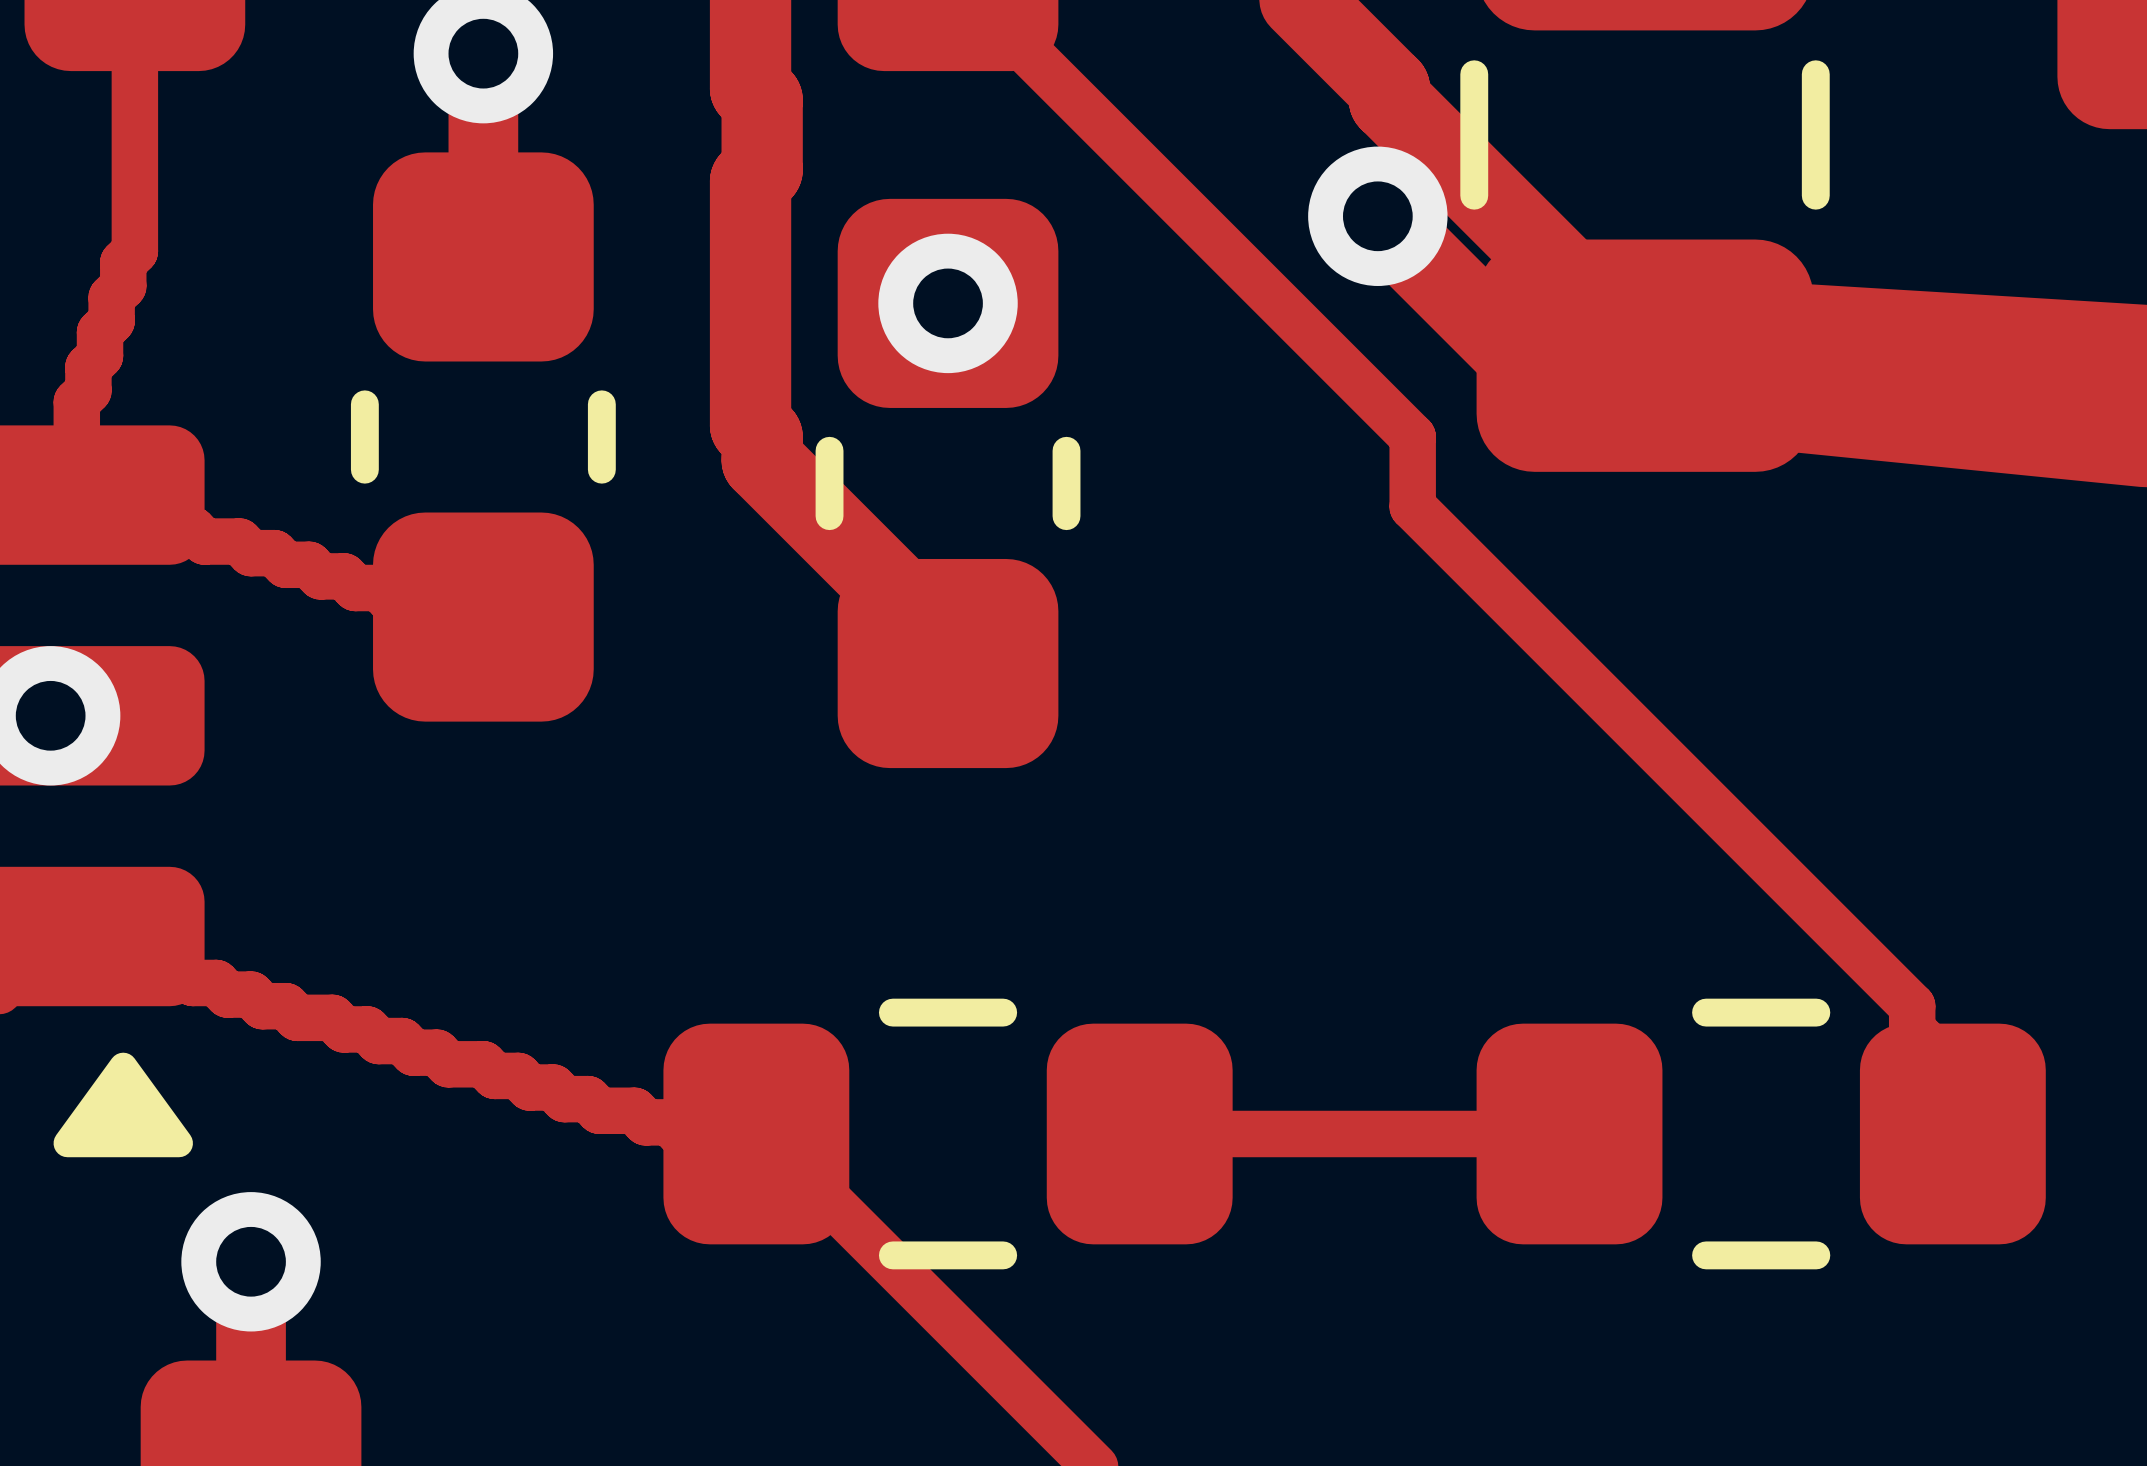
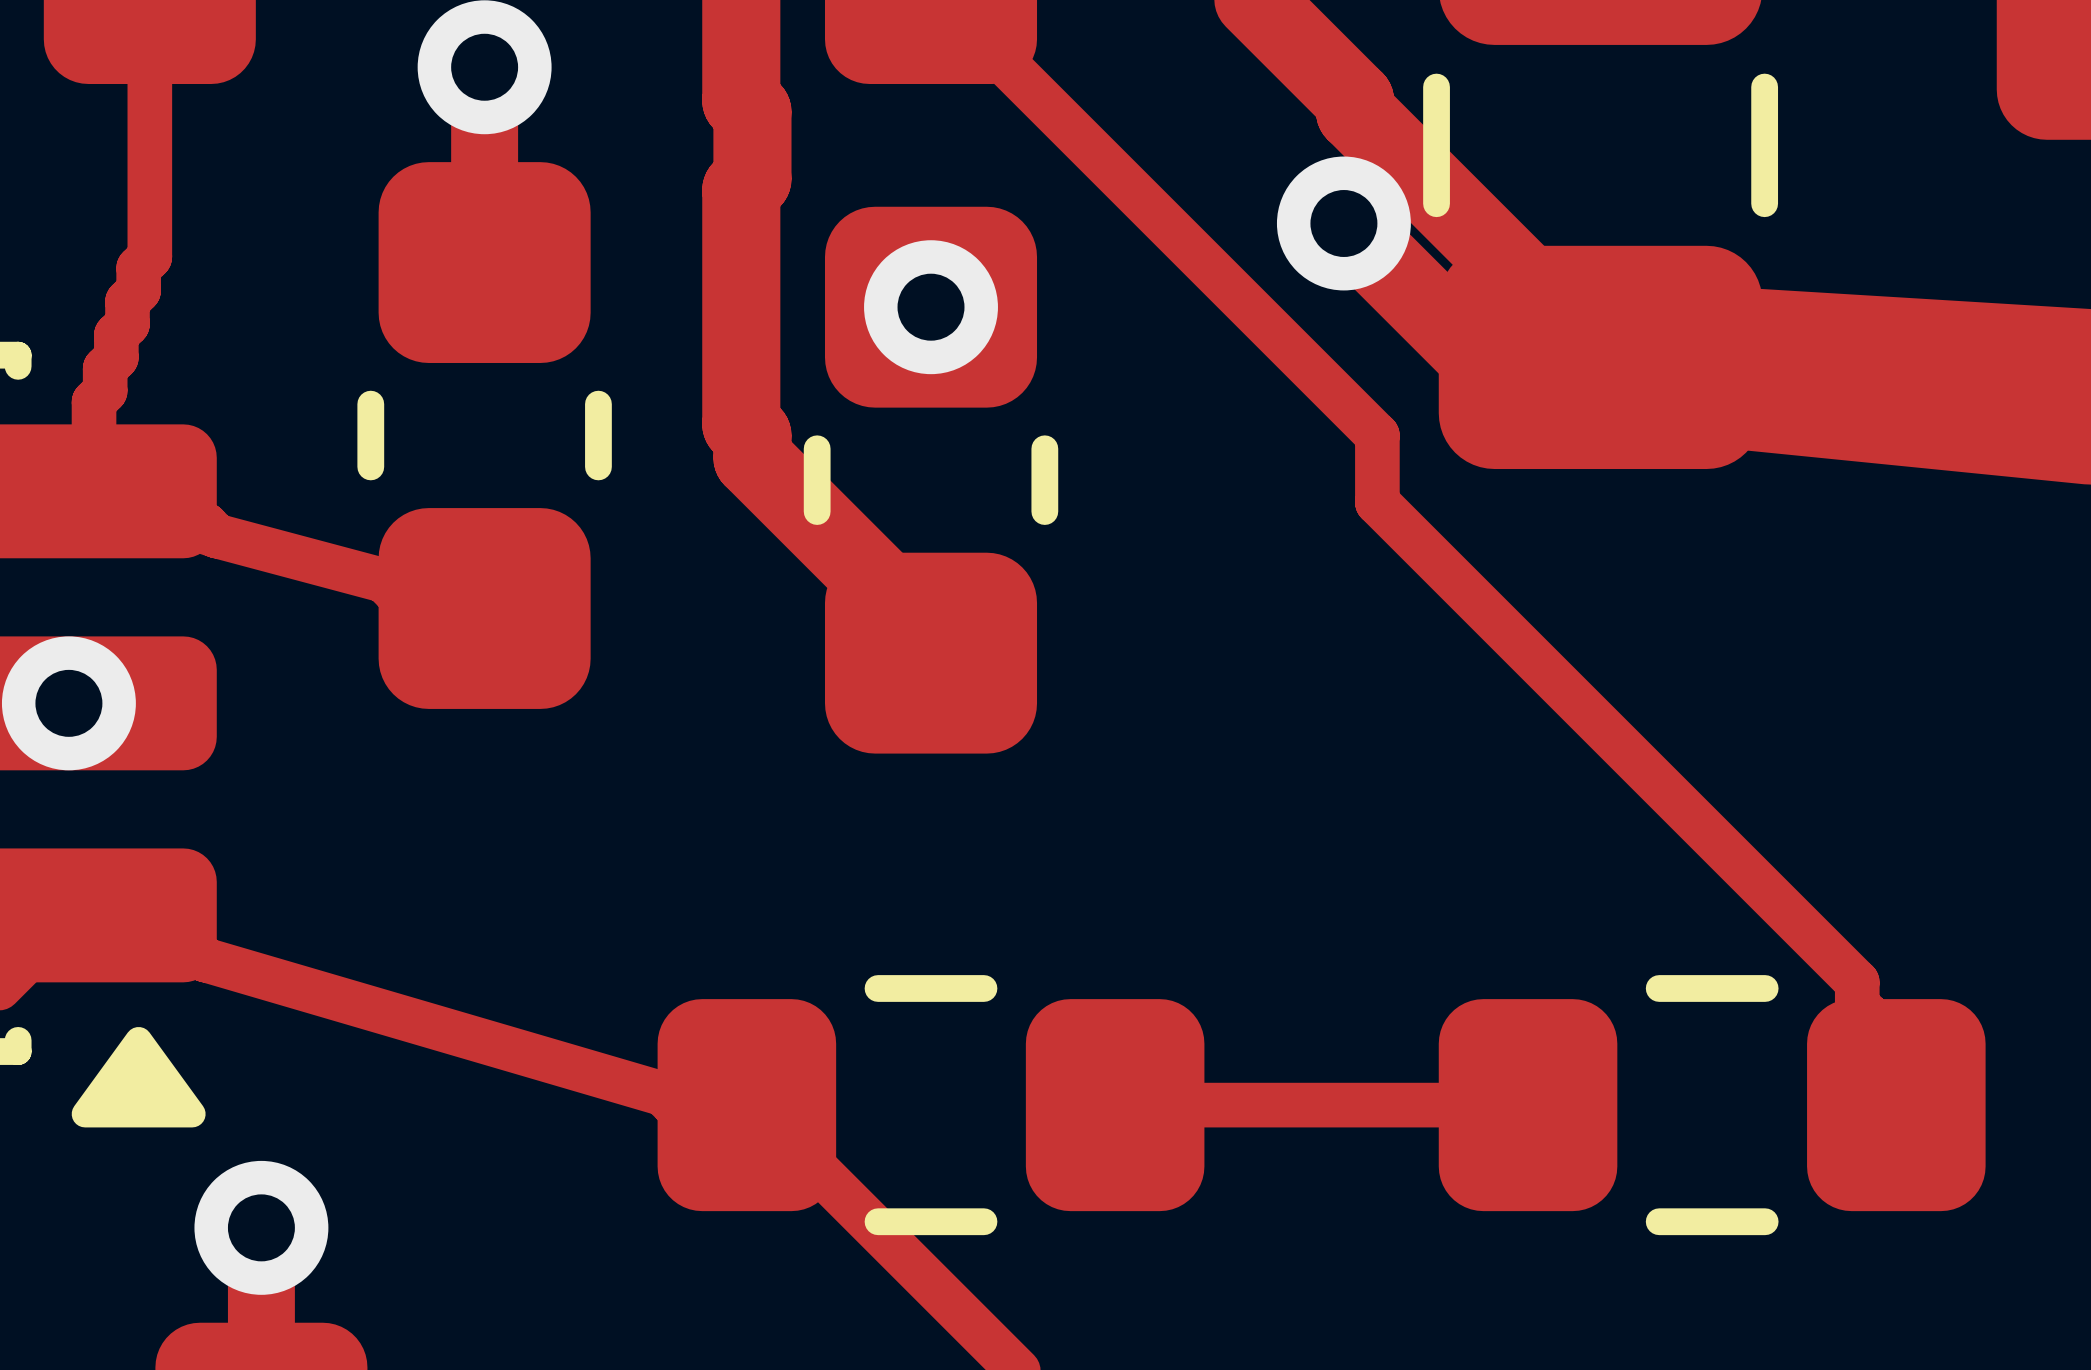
track: (204, 541) (239, 541) (251, 553) (274, 553) (285, 564) (309, 564) (320, 576) (343, 576) (355, 588) (378, 588) -> (183, 524) (216, 535) (384, 580)
track: (192, 982) (216, 982) (227, 994) (251, 994) (262, 1006) (285, 1006) (297, 1017) (332, 1017) (343, 1029) (367, 1029) (378, 1041) (402, 1041) (413, 1052) (436, 1052) (448, 1064) (483, 1064) (494, 1075) (518, 1075) (529, 1087) (553, 1087) (564, 1099) (587, 1099) (599, 1110) (634, 1110) (646, 1122) (669, 1122) -> (172, 948) (663, 1093)

